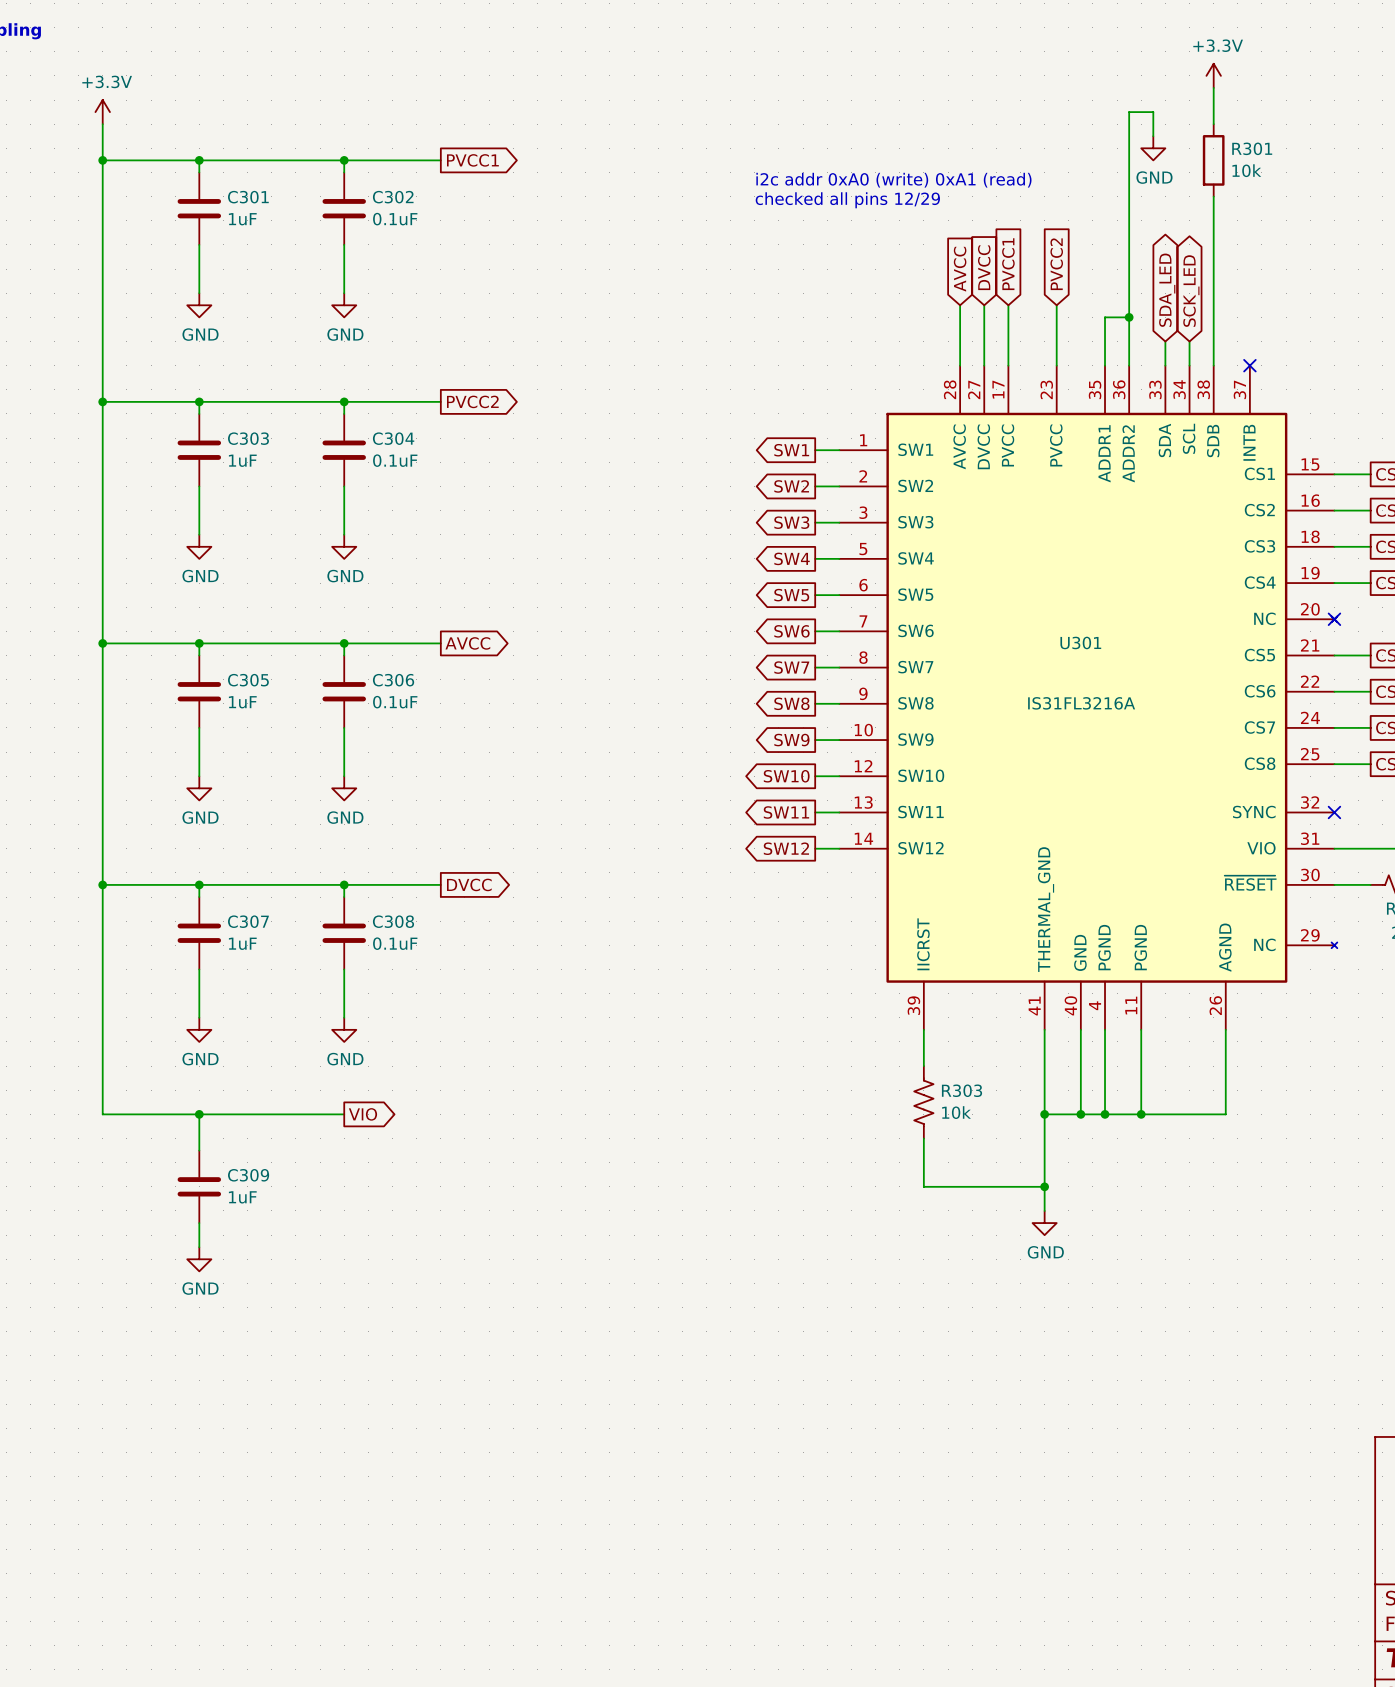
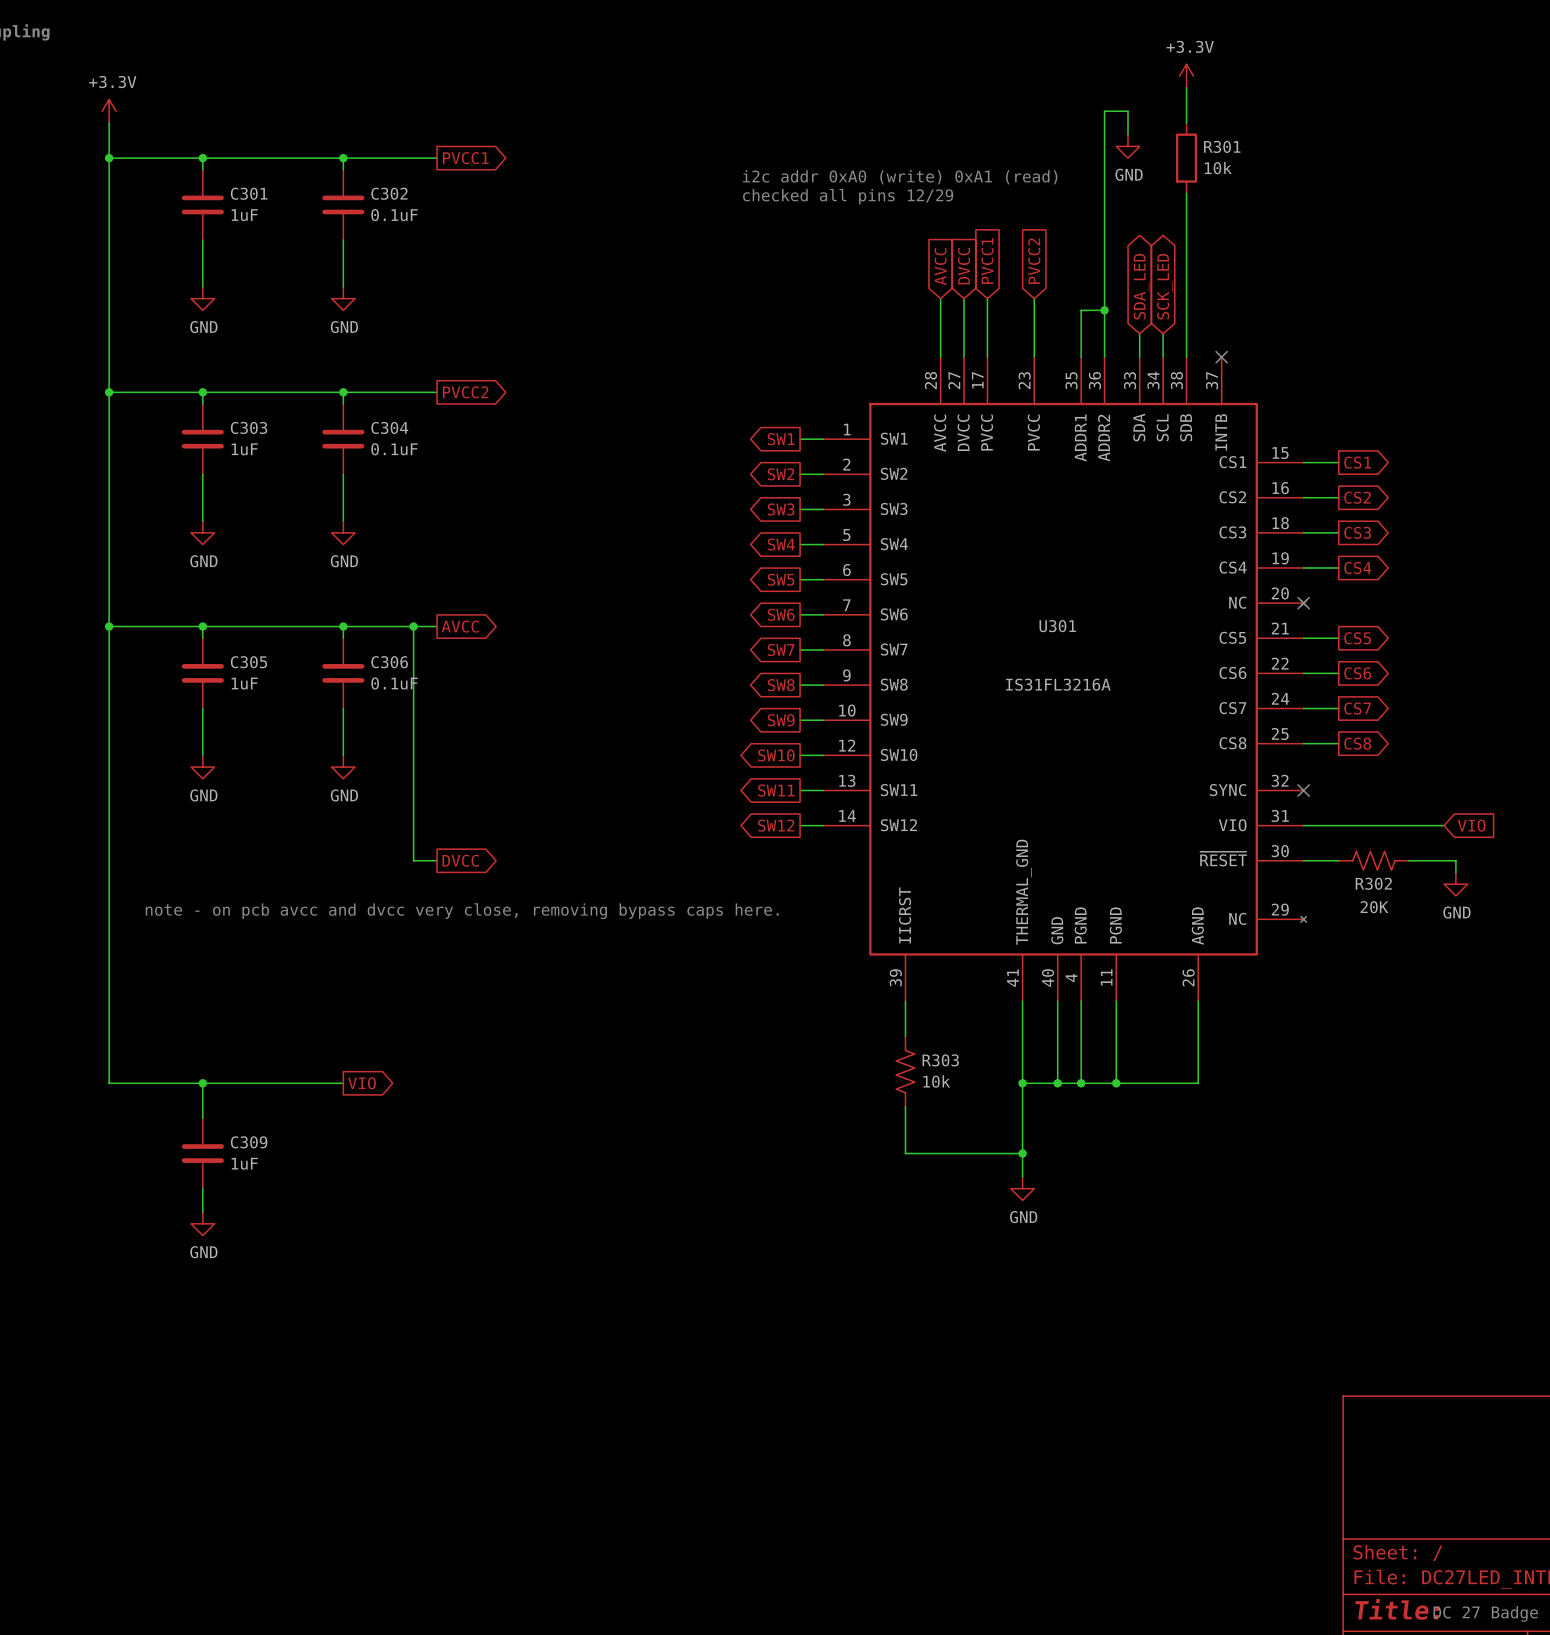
junction: none -> (413, 626)
wire: (102, 884) (416, 884) -> (413, 626) (413, 860)
junction: (102, 884) -> none
wire: (199, 884) (199, 897) -> none
junction: (199, 884) -> none
wire: (344, 884) (344, 897) -> none
junction: (344, 884) -> none
C307: 1uF (199, 933) -> none
C308: 0.1uF (344, 933) -> none
text: none -> note - on pcb avcc and dvcc very close, removing bypass caps here. (462, 911)
wire: (199, 969) (199, 1017) -> none
wire: (344, 969) (344, 1017) -> none
power symbol: GND (199, 1029) -> none
power symbol: GND (344, 1029) -> none

